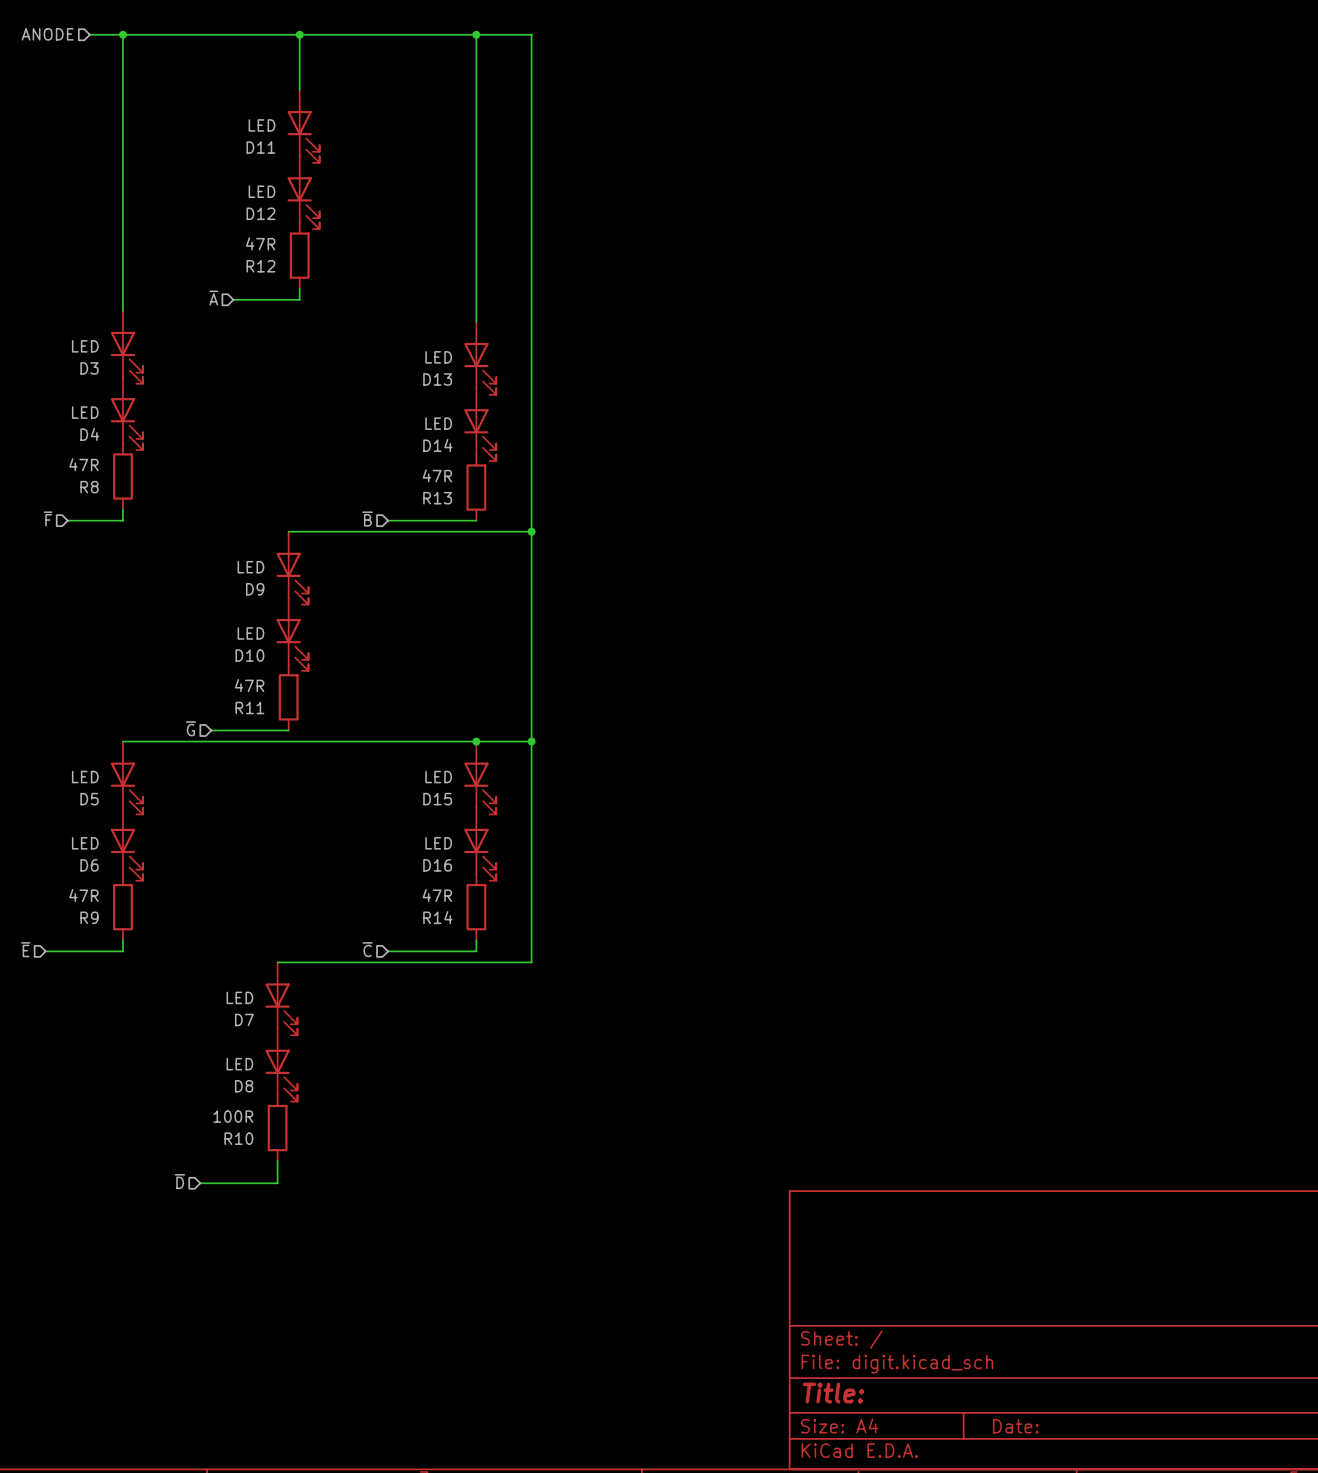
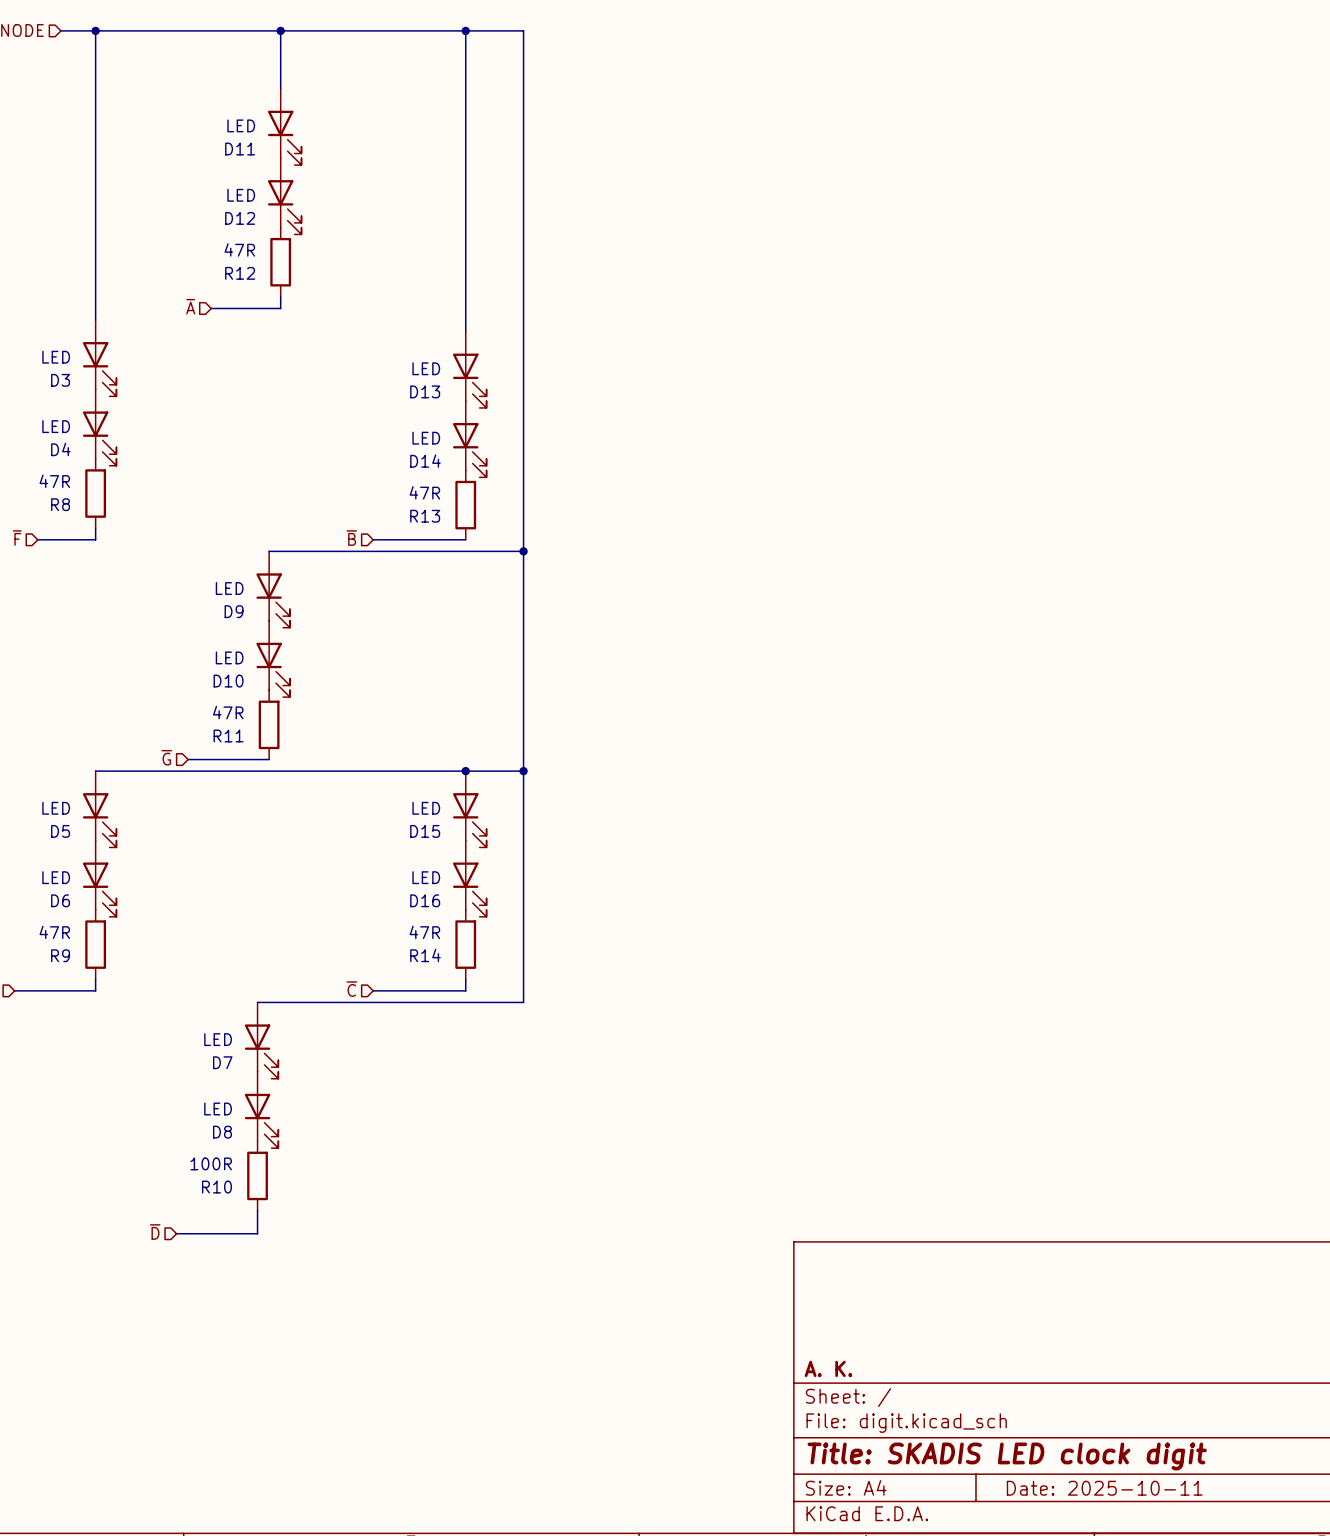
title block: none -> A. K. (828, 1368)
title block: Title: (833, 1393) -> Title: SKADIS LED clock digit (1007, 1456)
title block: Date: (1015, 1426) -> Date: 2025-10-11 (1104, 1488)

